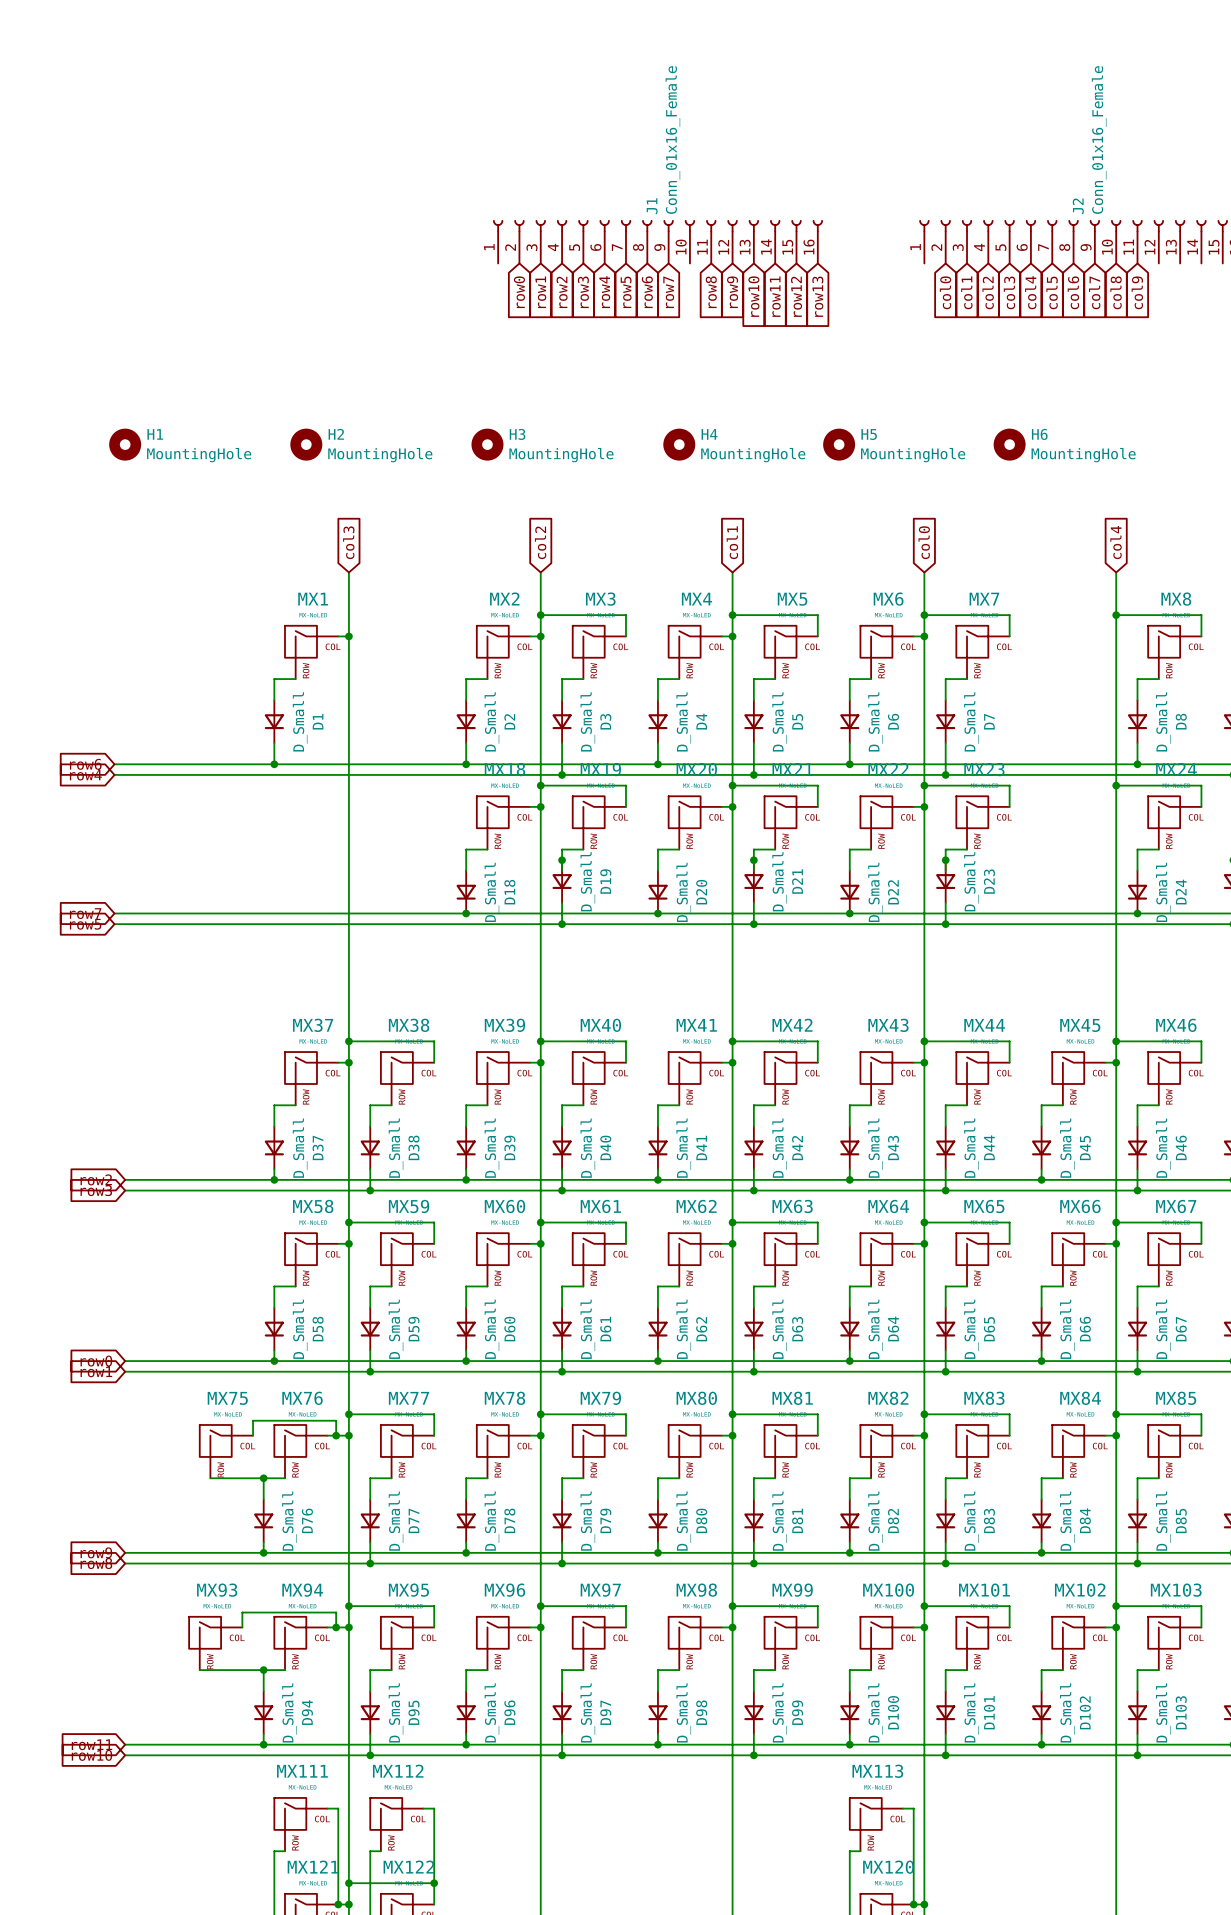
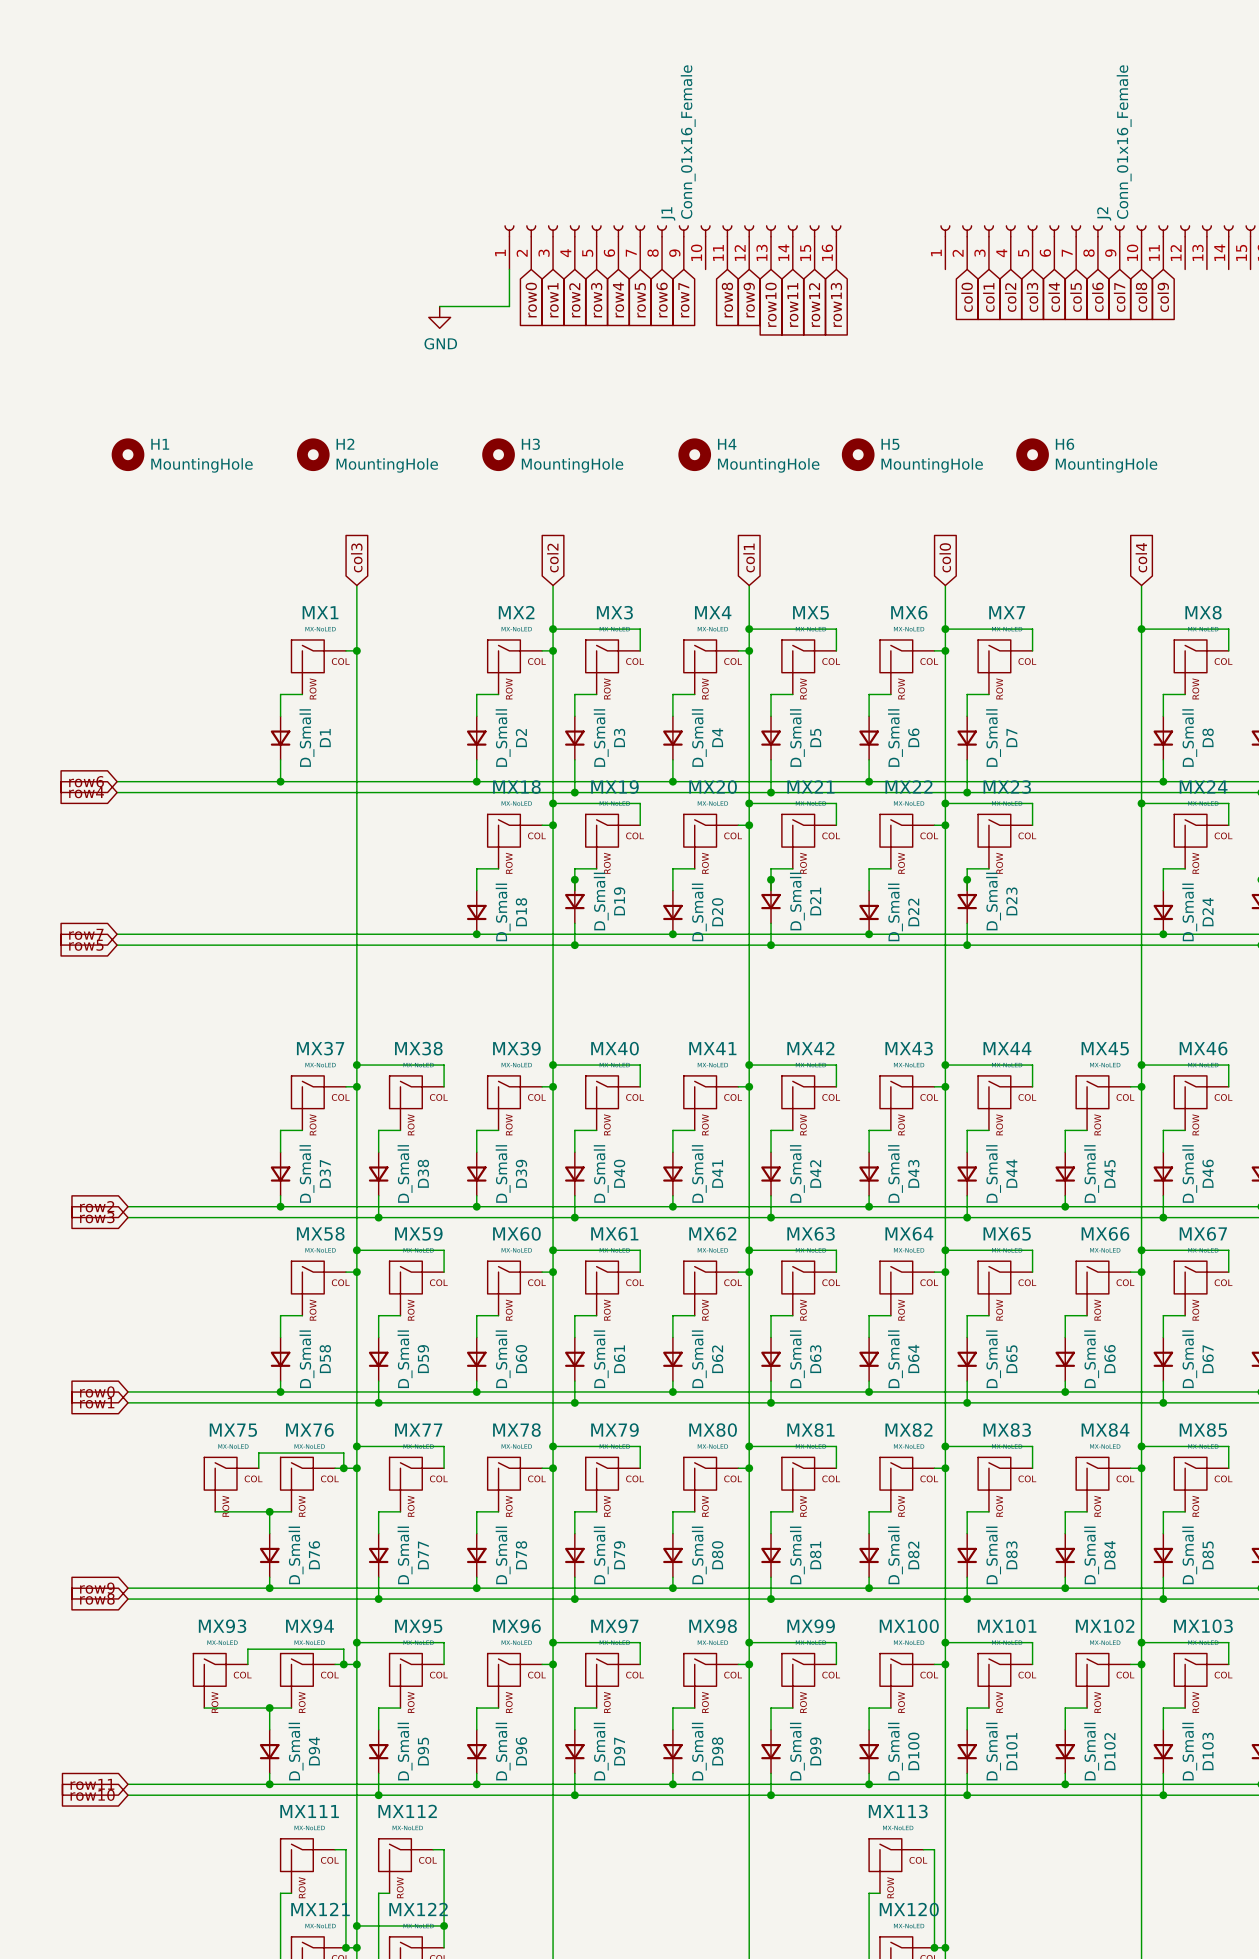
wire: none -> (509, 269) (509, 306) (439, 306)
power symbol: none -> GND (439, 317)

